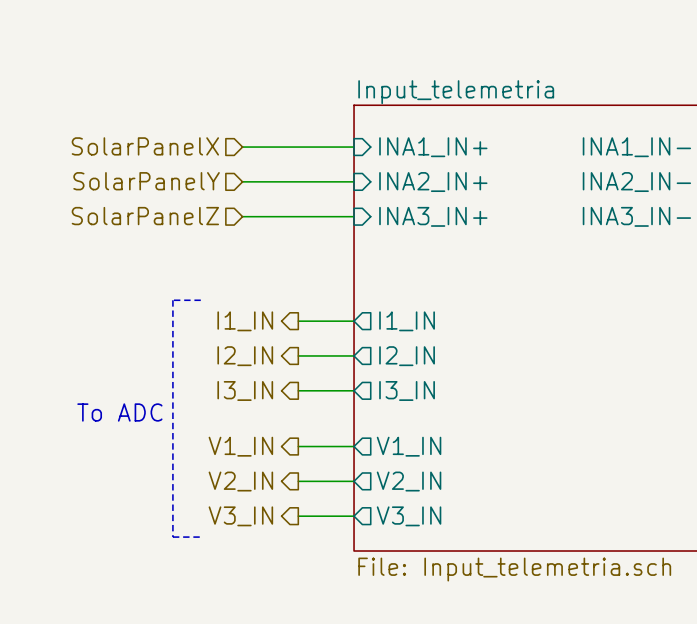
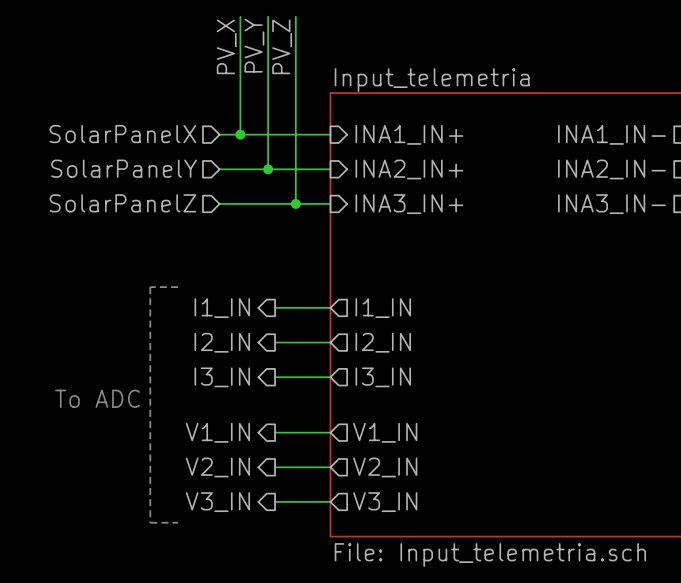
wire: none -> (240, 16) (240, 134)
wire: none -> (268, 16) (268, 169)
wire: none -> (295, 16) (295, 203)
label: none -> PV_Y (254, 45)
label: none -> PV_X (226, 46)
label: none -> PV_Z (282, 46)
junction: none -> (240, 134)
junction: none -> (268, 169)
junction: none -> (295, 203)

